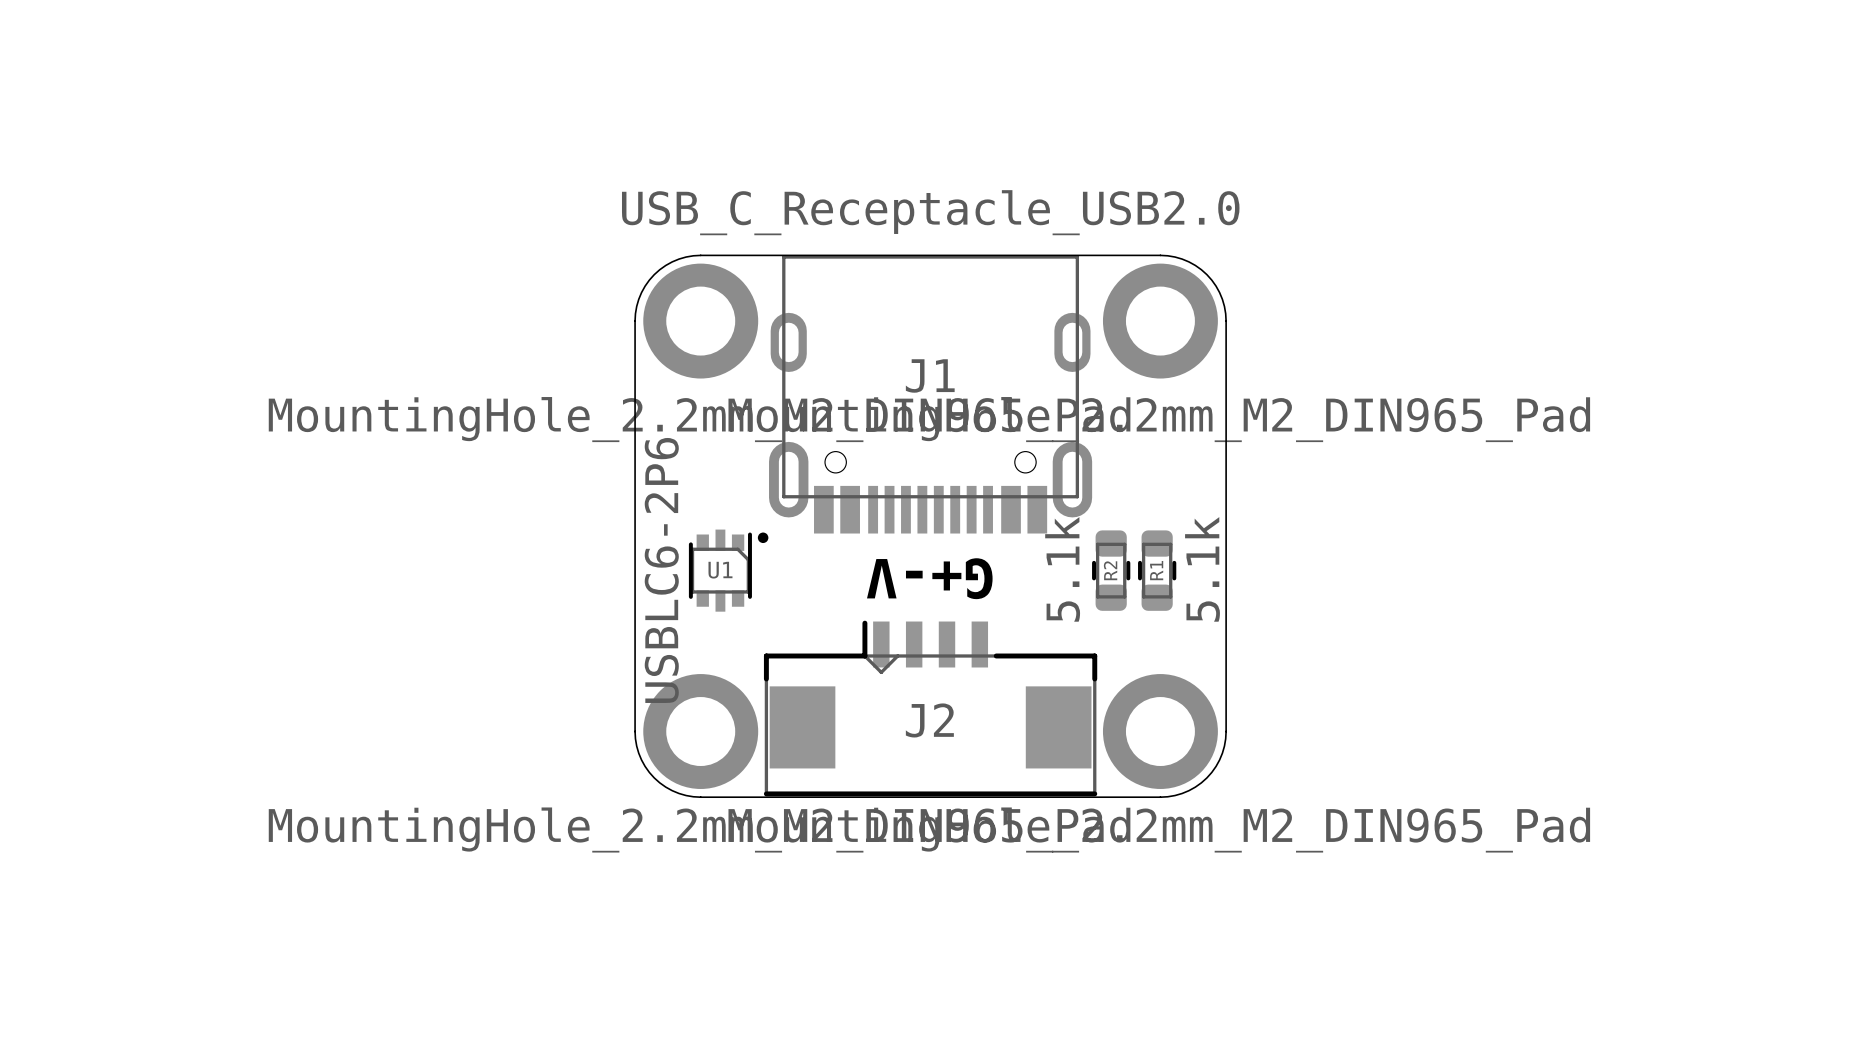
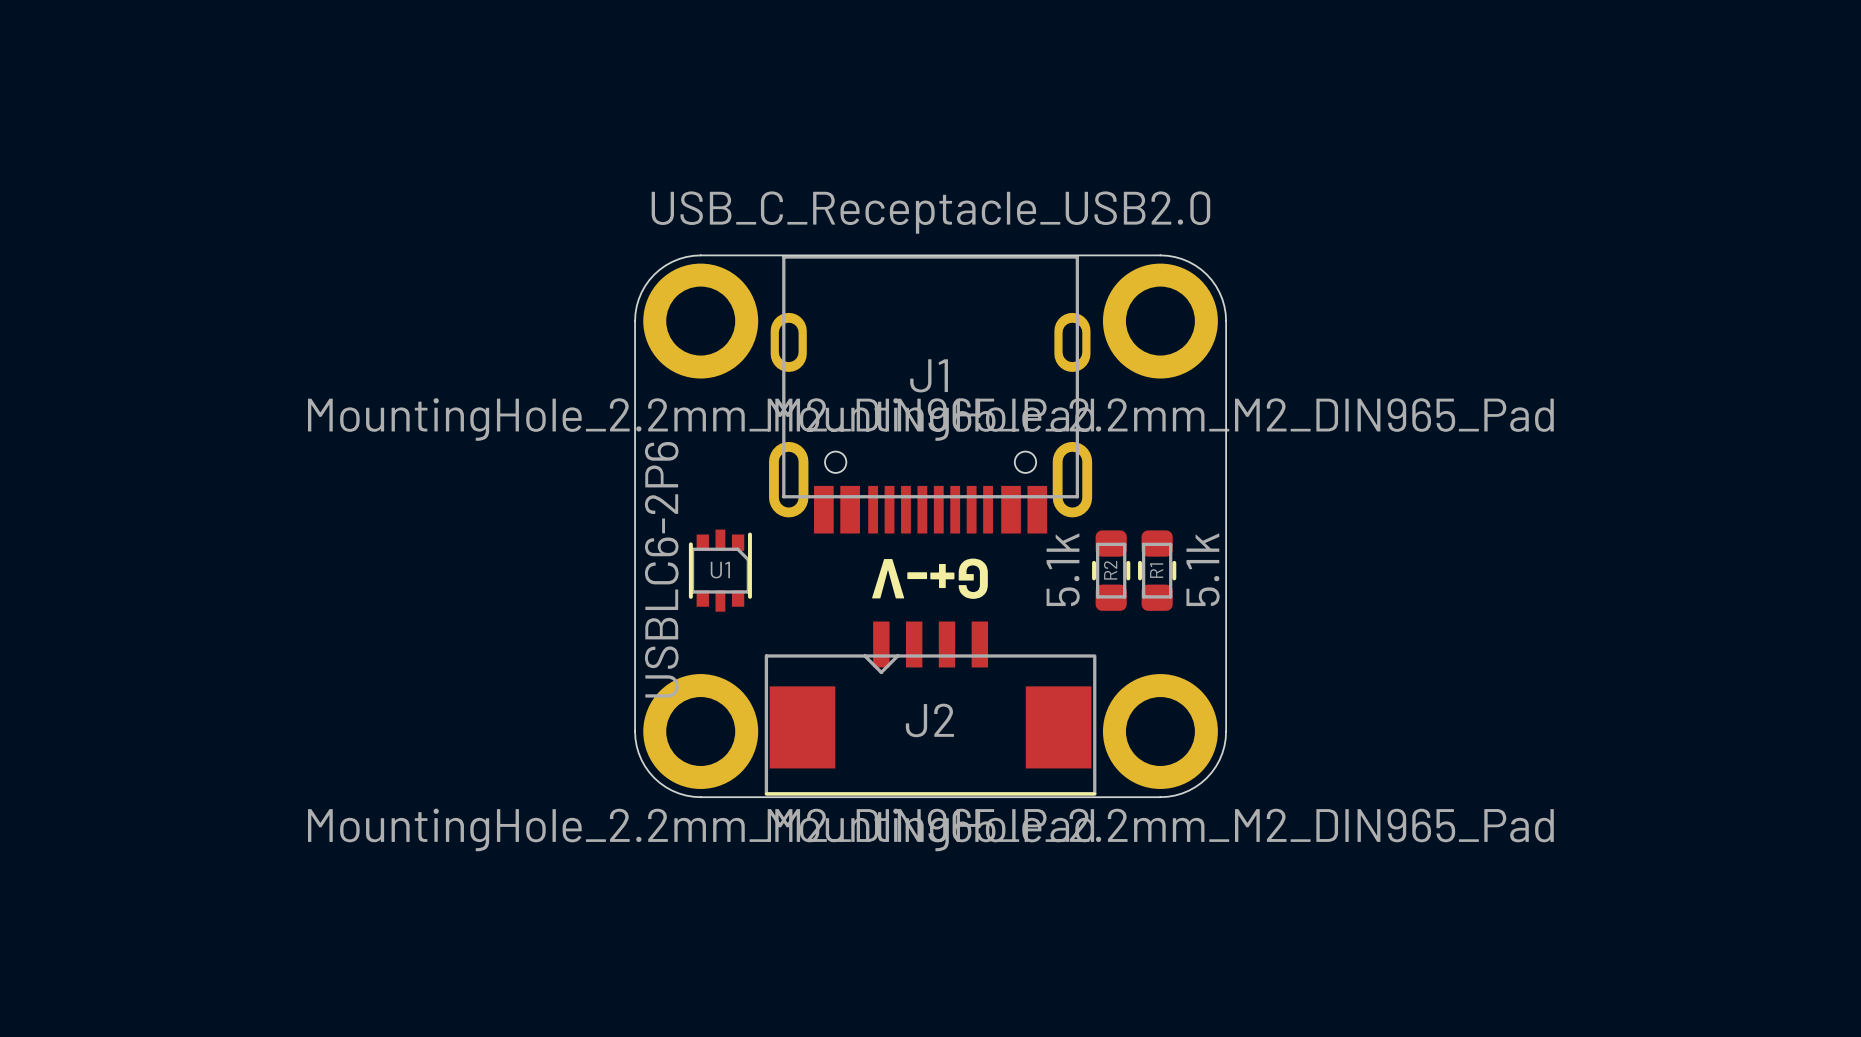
drawing: [757, 532, 769, 544] -> none
J2 footprint: [763, 620, 1098, 797] -> [764, 621, 1097, 796]

